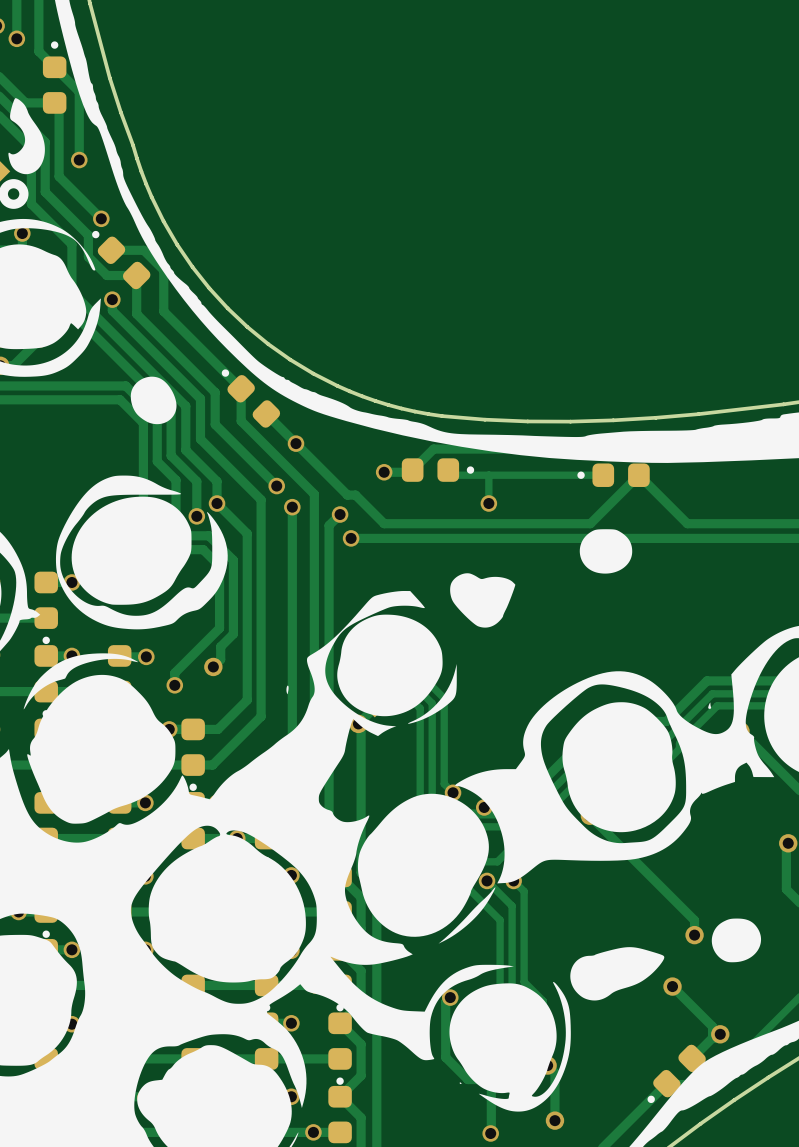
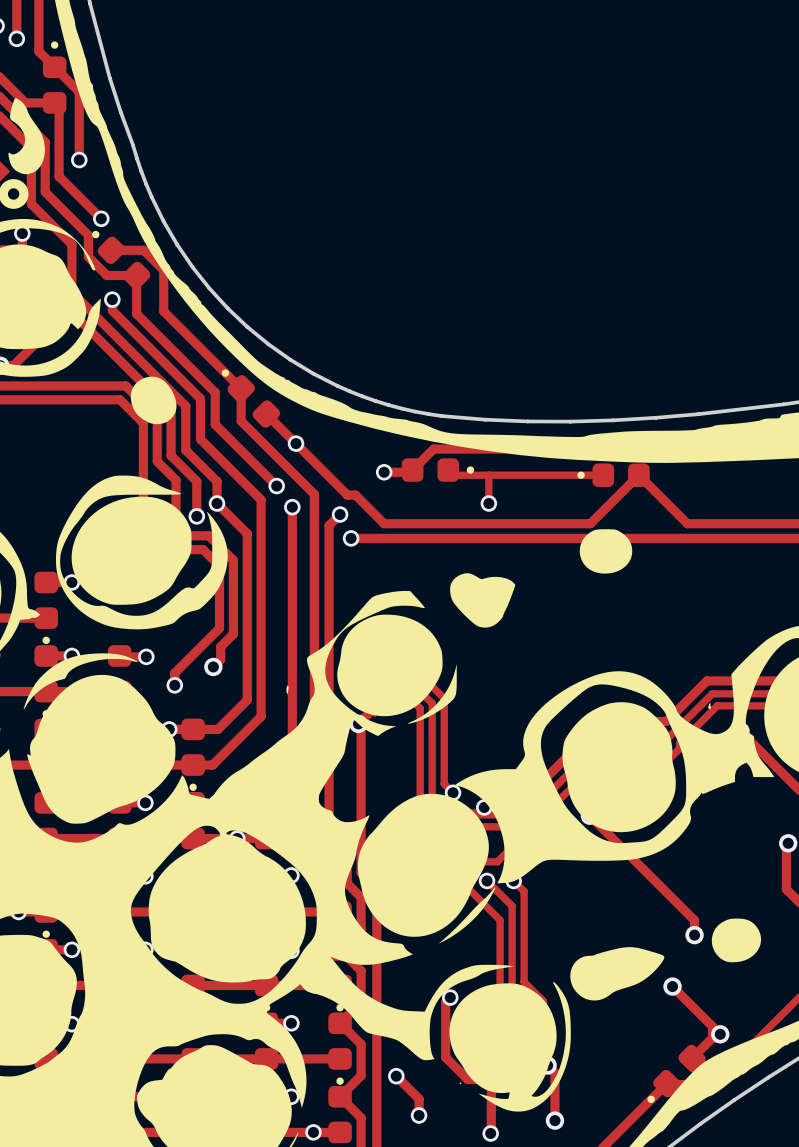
track: none -> (396, 1076) (419, 1098) (419, 1115)
via: none -> (396, 1076)
via: none -> (419, 1115)

